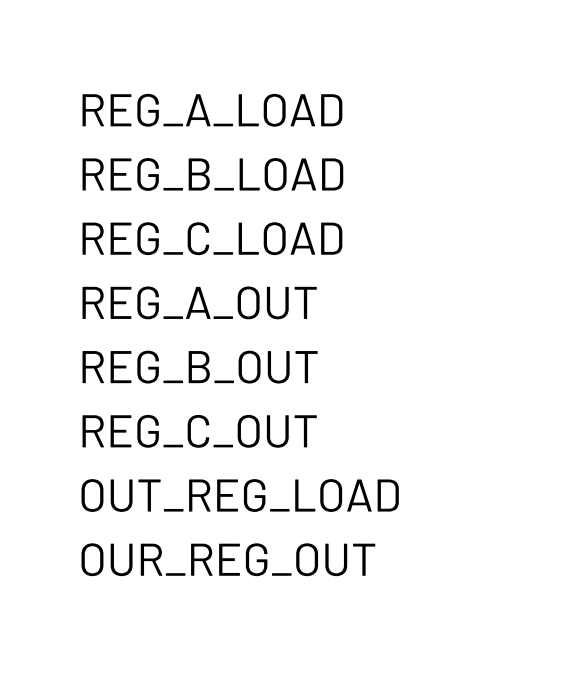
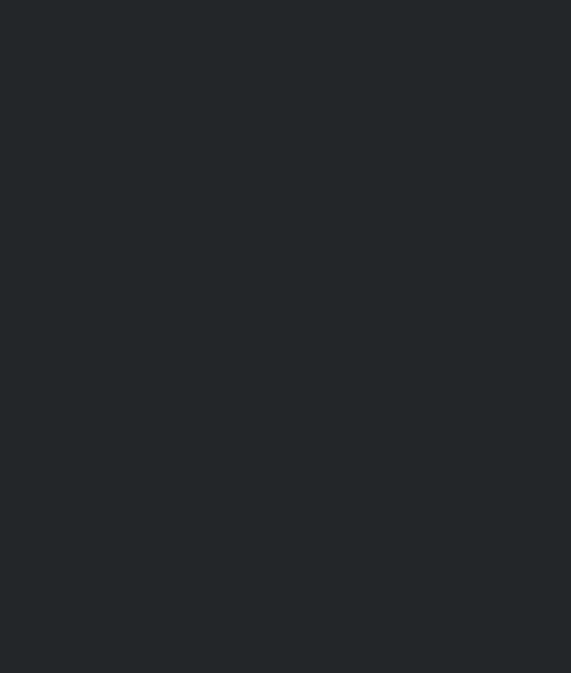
label: REG_A_LOAD (212, 110) -> none
label: REG_B_LOAD (212, 174) -> none
label: REG_C_LOAD (212, 238) -> none
label: REG_A_OUT (199, 302) -> none
label: REG_B_OUT (200, 367) -> none
label: REG_C_OUT (199, 431) -> none
label: OUT_REG_LOAD (240, 495) -> none
label: OUR_REG_OUT (228, 559) -> none

